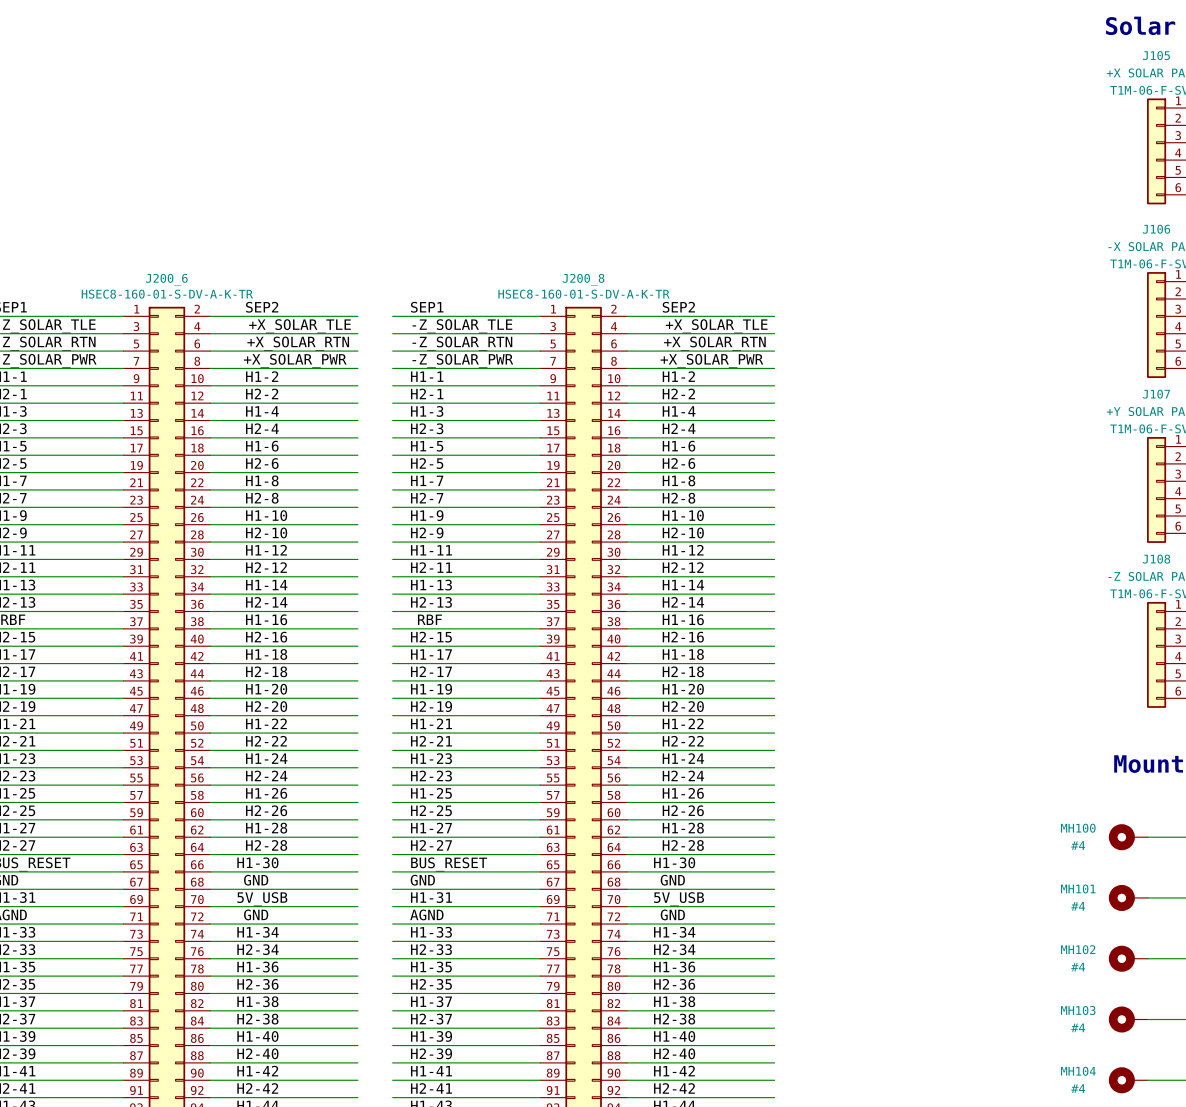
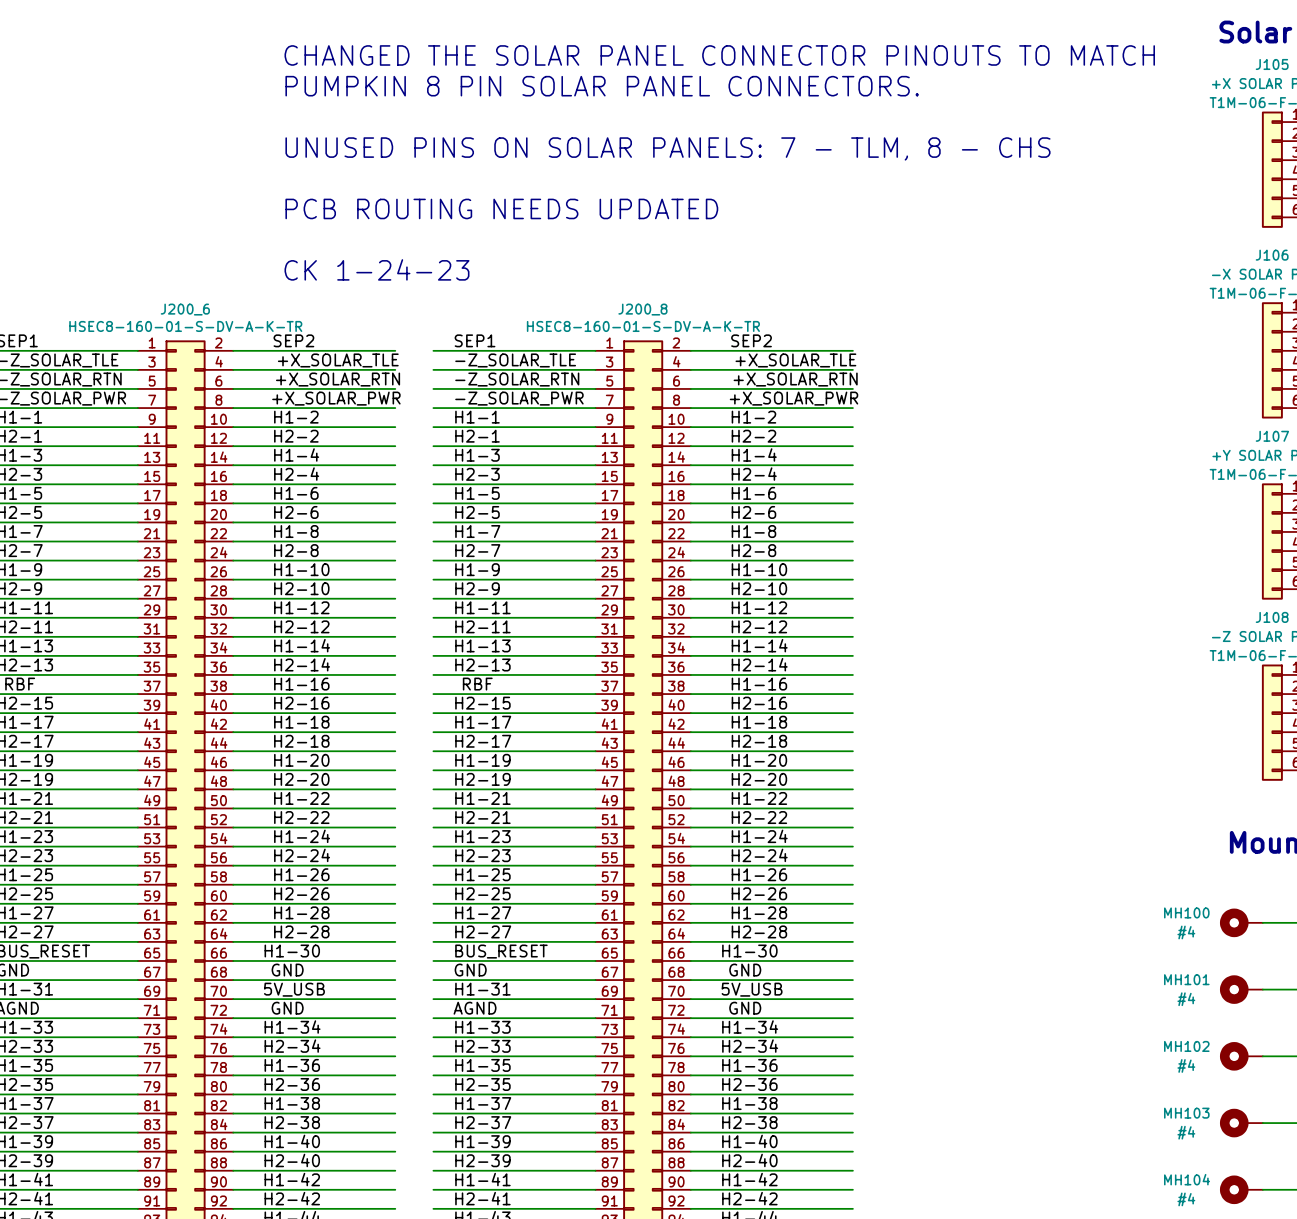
text: none -> CHANGED THE SOLAR PANEL CONNECTOR PINOUTS TO MATCH (719, 55)
text: none -> PUMPKIN 8 PIN SOLAR PANEL CONNECTORS. (602, 86)
text: none -> UNUSED PINS ON SOLAR PANELS: 7 - TLM, 8 - CHS (667, 148)
text: none -> PCB ROUTING NEEDS UPDATED (501, 208)
text: none -> CK 1-24-23 (376, 269)

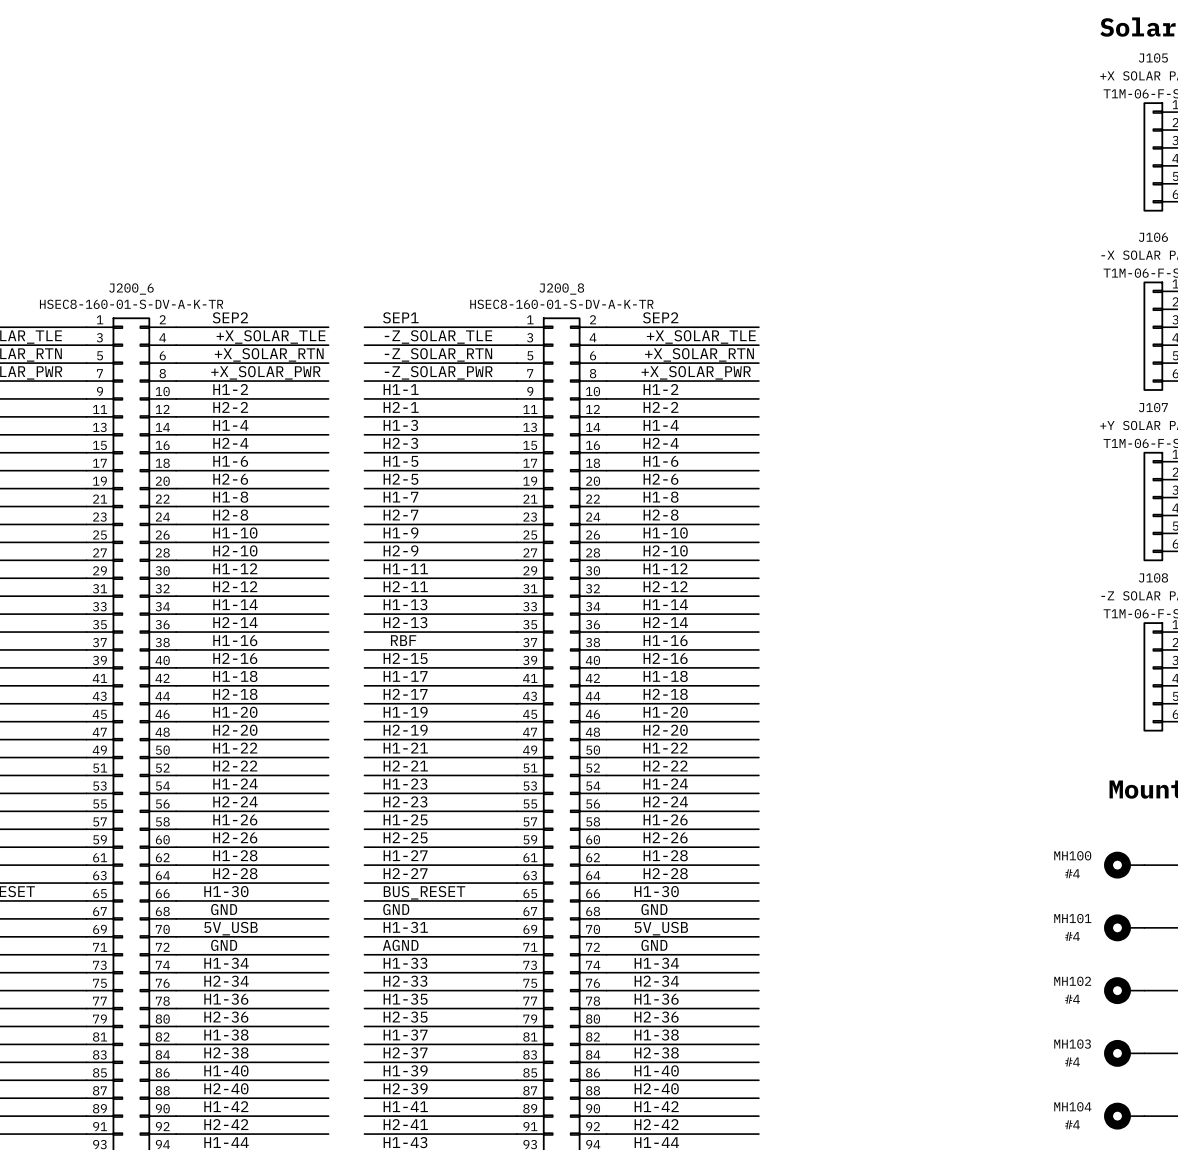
text: CHANGED THE SOLAR PANEL CONNECTOR PINOUTS TO MATCH (719, 55) -> none
text: PUMPKIN 8 PIN SOLAR PANEL CONNECTORS. (602, 86) -> none
text: UNUSED PINS ON SOLAR PANELS: 7 - TLM, 8 - CHS (667, 148) -> none
text: PCB ROUTING NEEDS UPDATED (501, 208) -> none
text: CK 1-24-23 (376, 269) -> none

